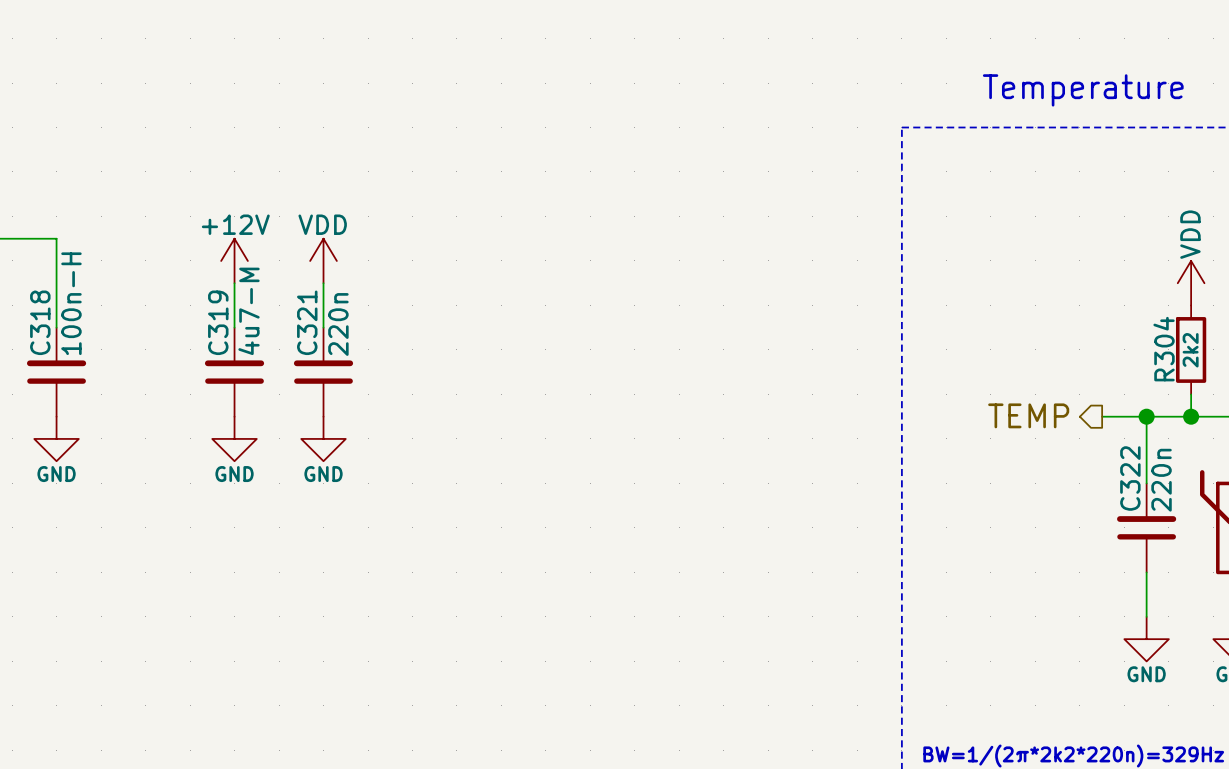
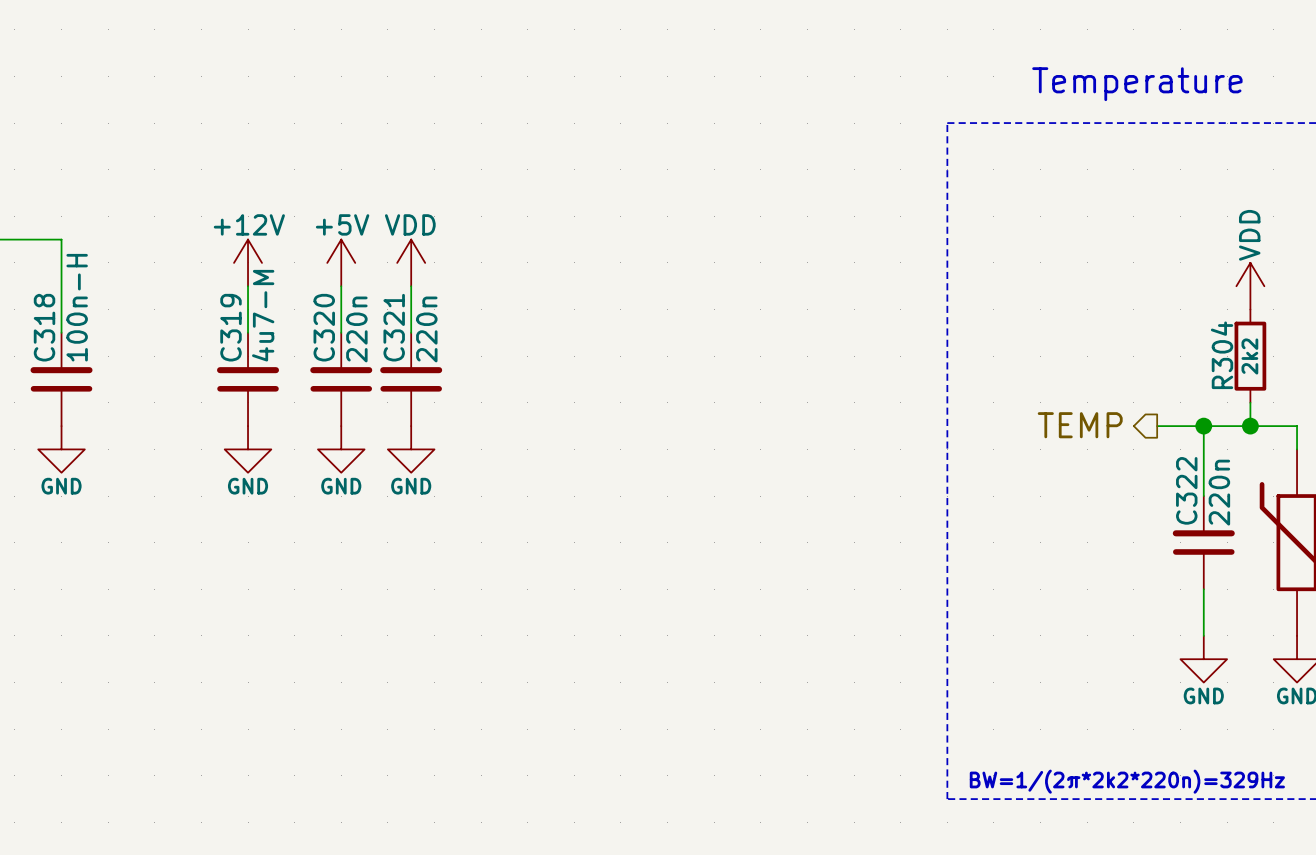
power symbol: VDD (323, 260) -> +5V (341, 262)
power symbol: none -> VDD (411, 262)
wire: none -> (411, 286) (411, 332)
C321 name: C321 (307, 322) -> C320 (324, 327)
C321: none -> 220n (411, 379)
power symbol: none -> GND (411, 449)

